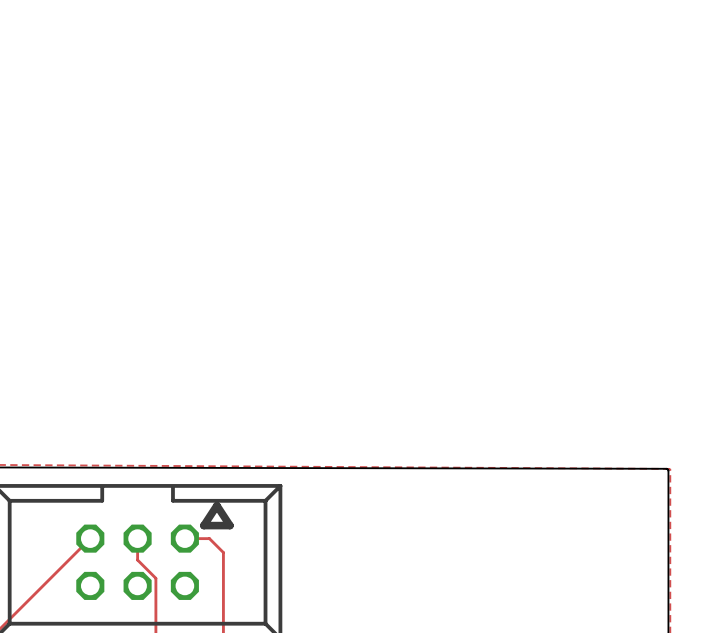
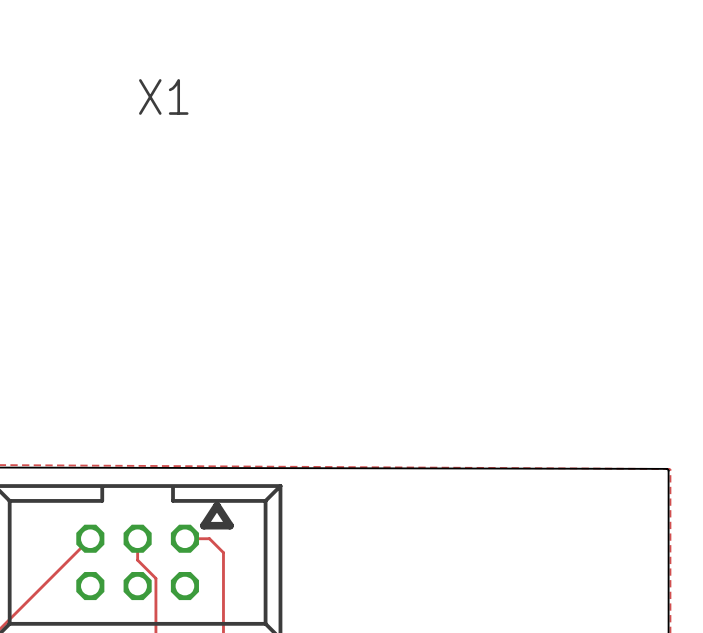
X1 name: none -> X1 (163, 96)

